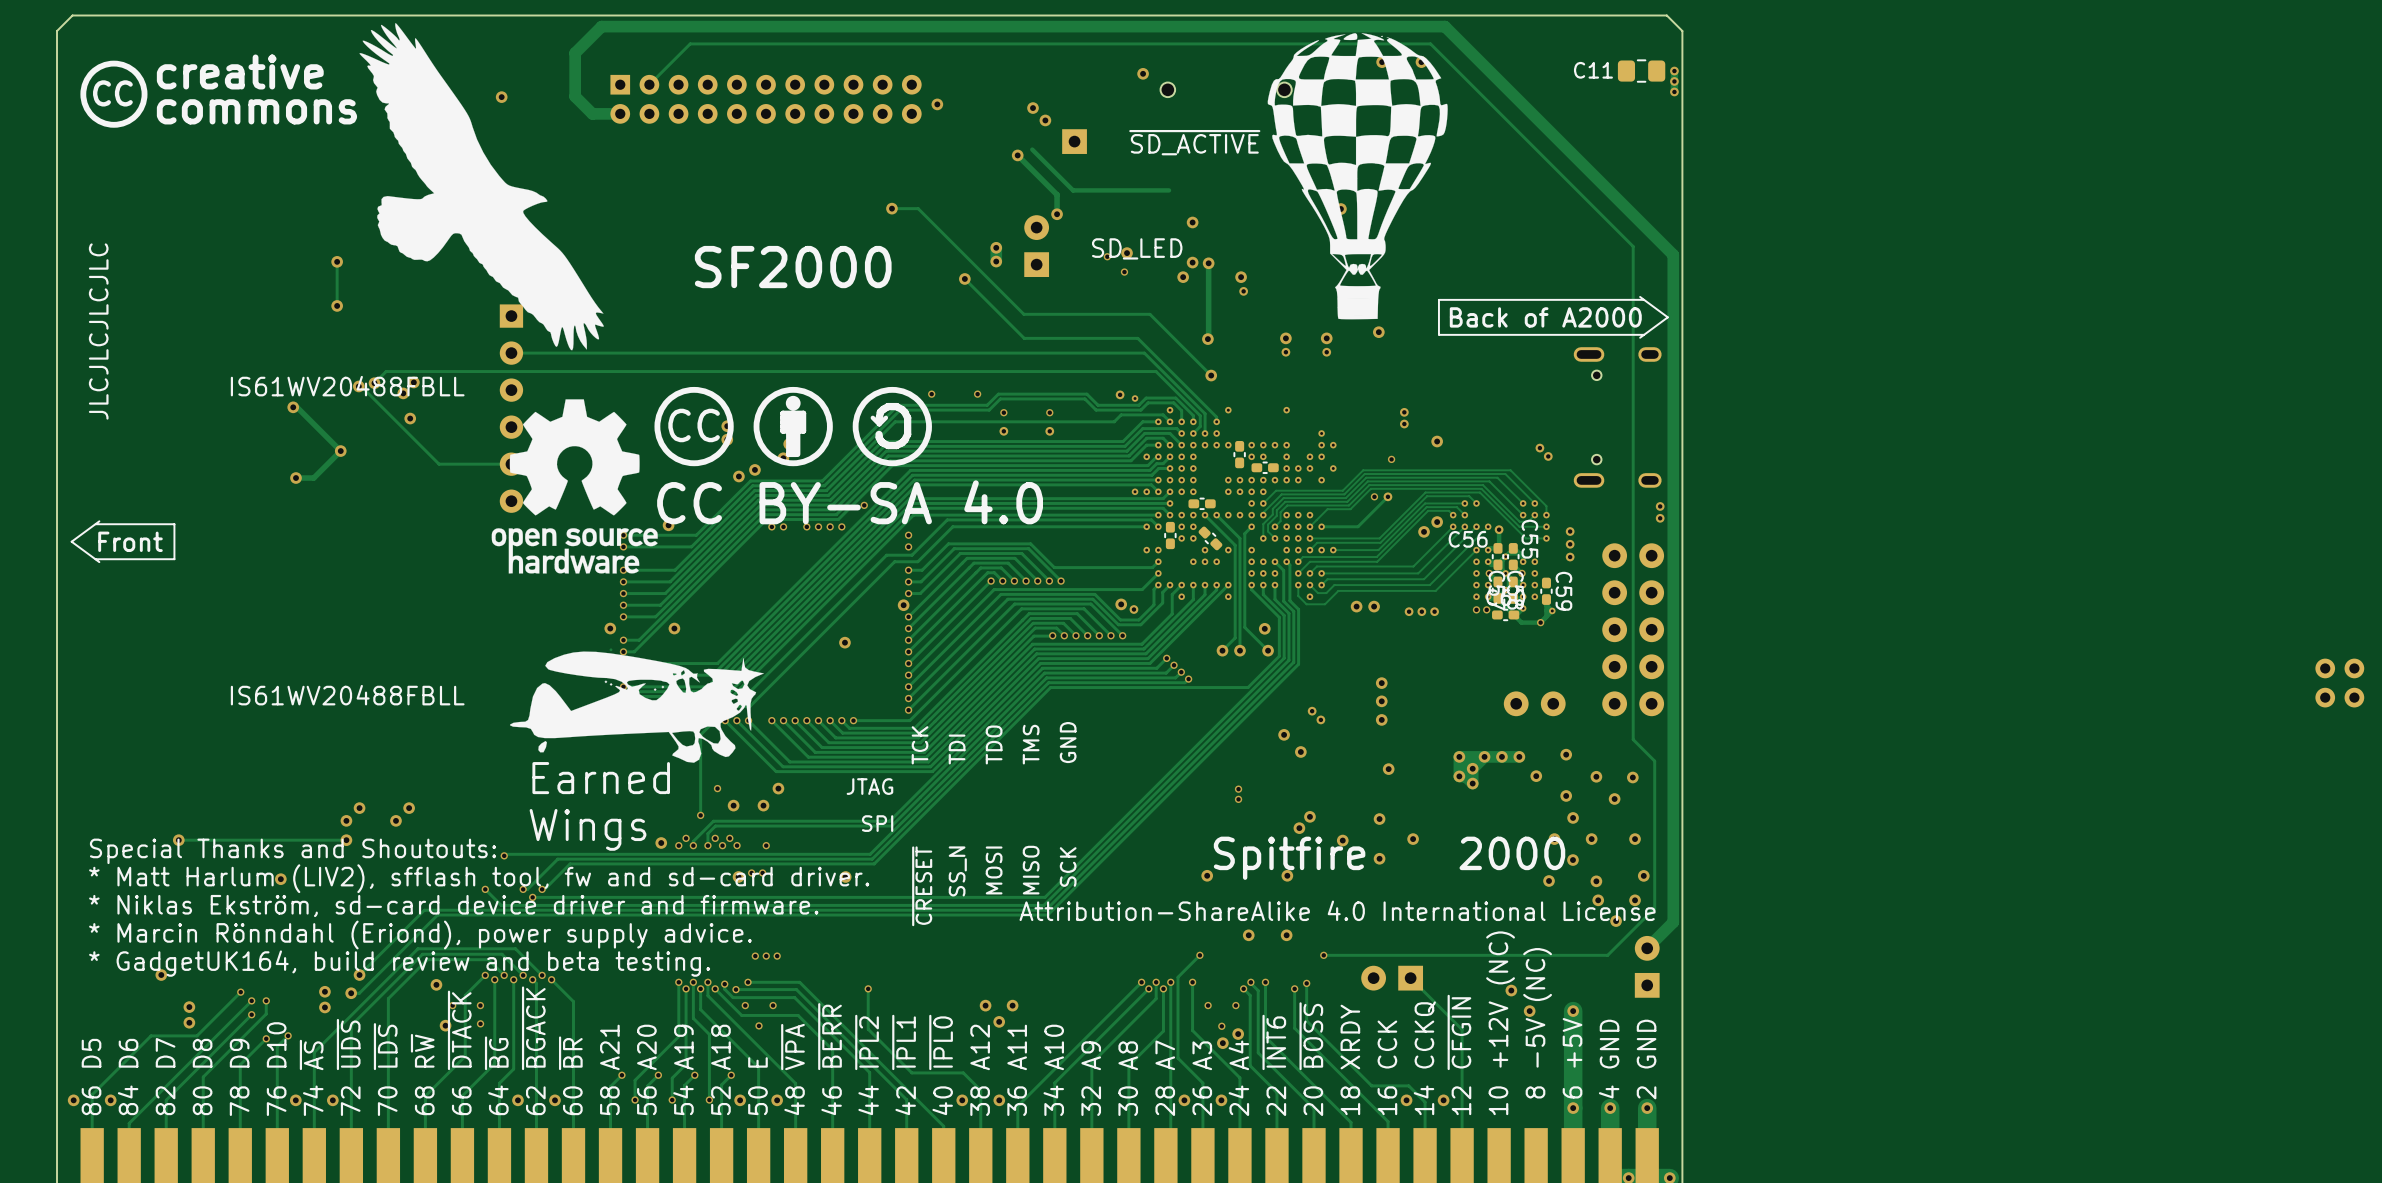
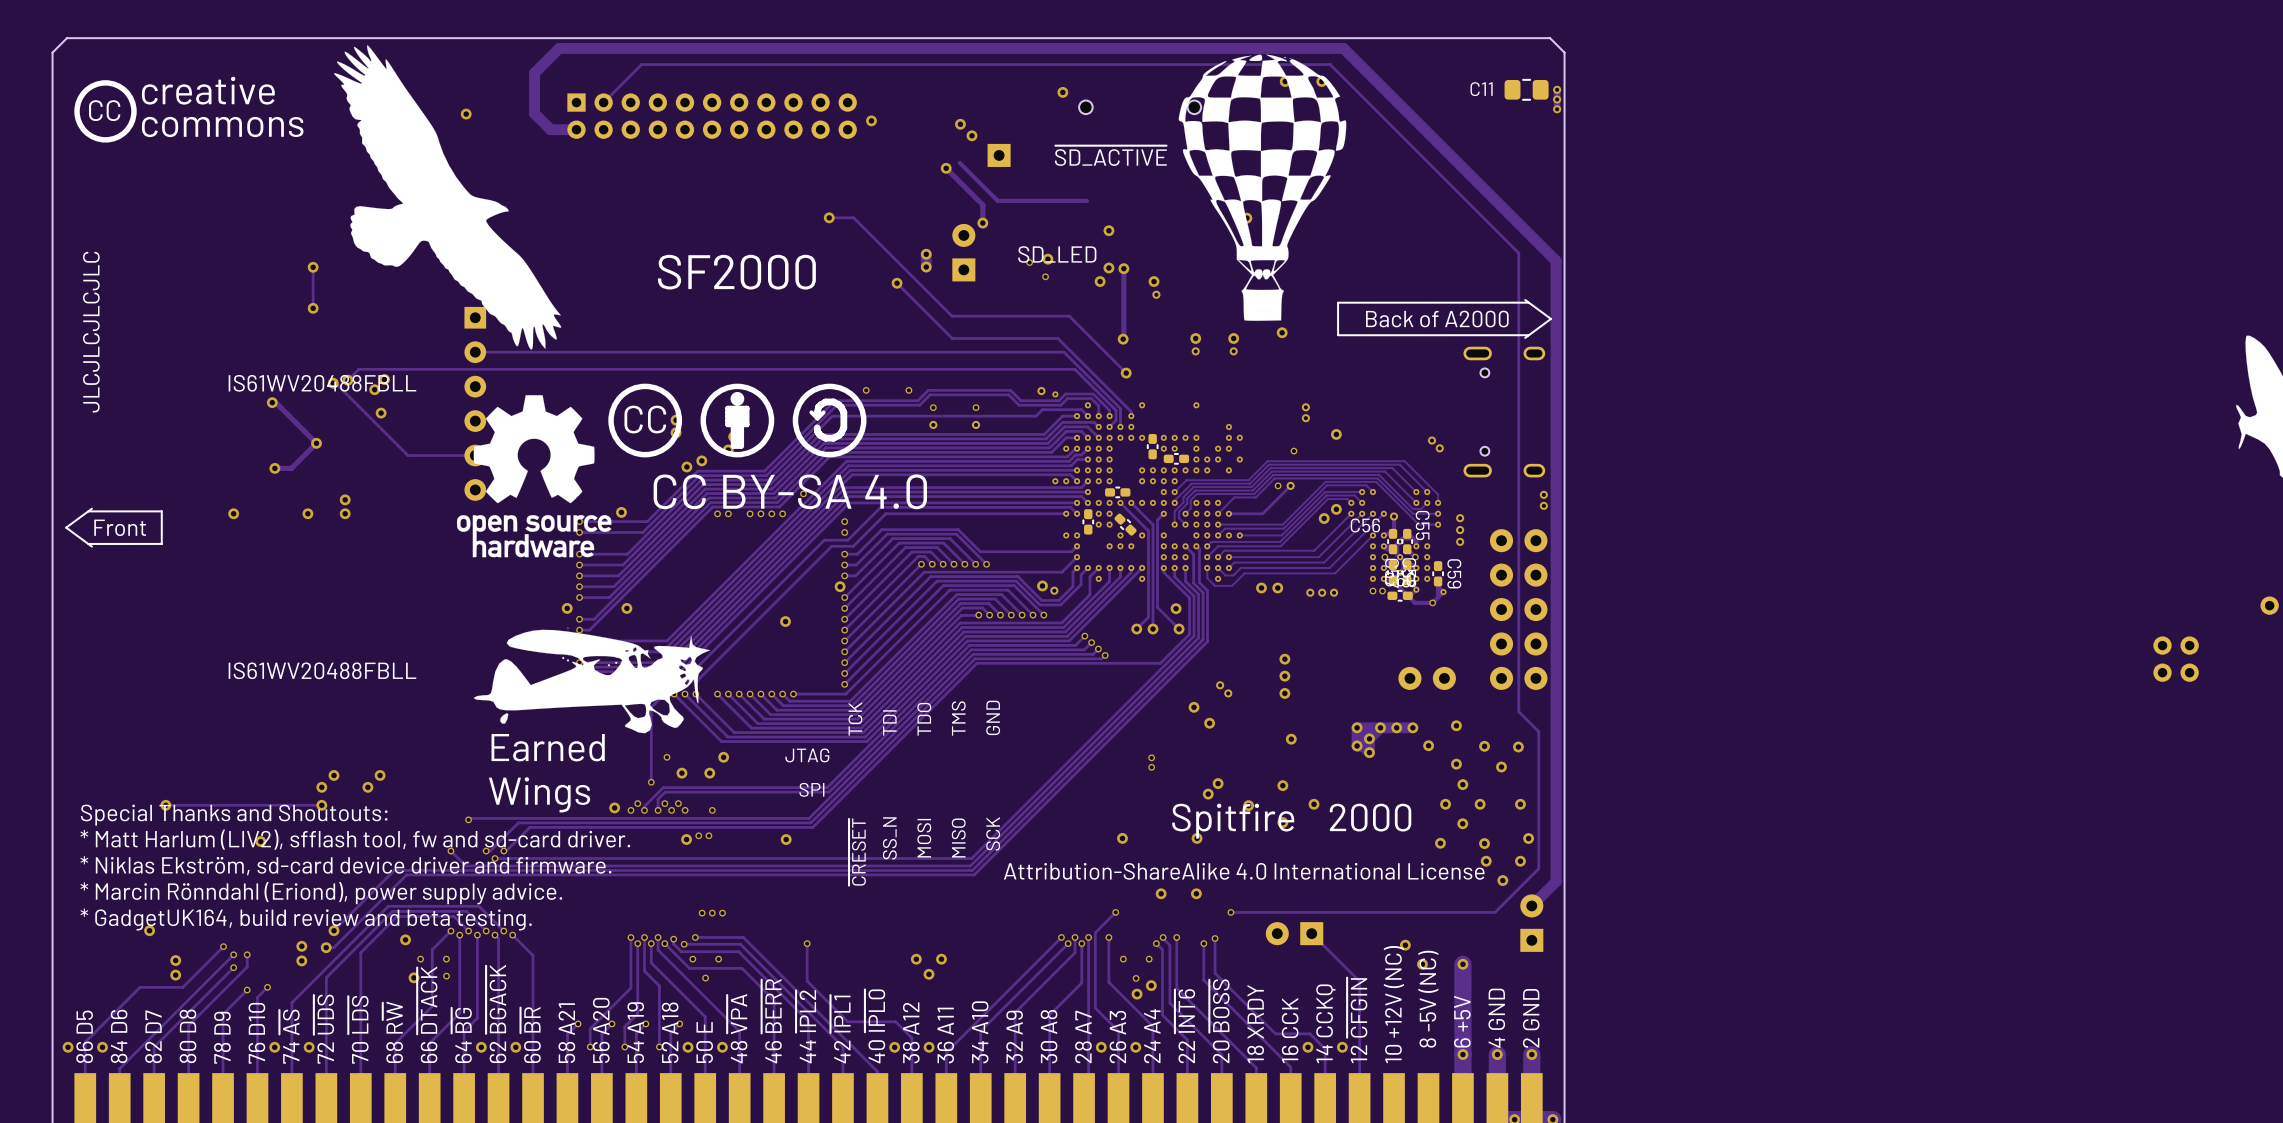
via: none -> (345, 499)
via: none -> (233, 513)
via: none -> (307, 513)
via: none -> (345, 513)

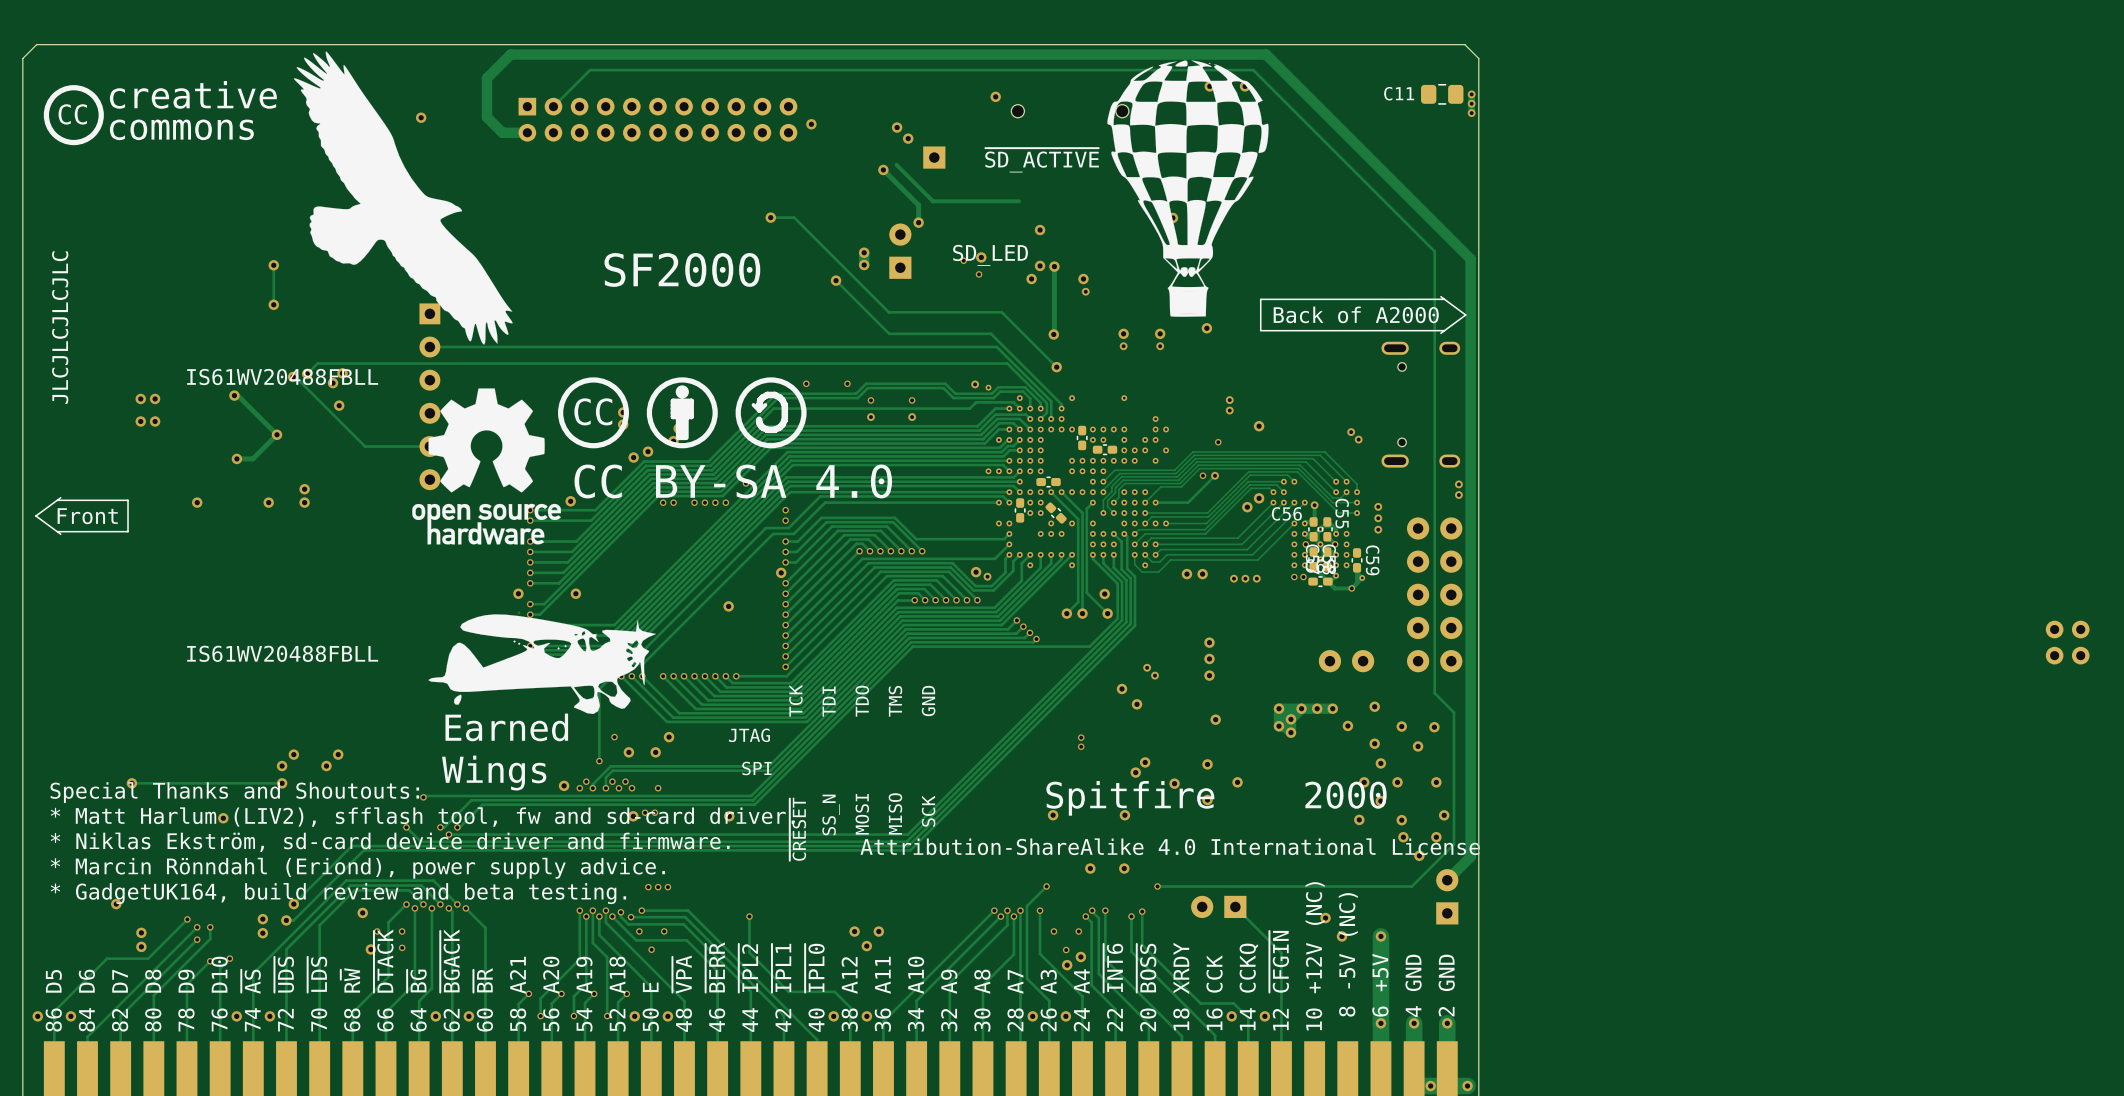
via: none -> (140, 398)
via: none -> (155, 398)
via: none -> (140, 421)
via: none -> (155, 421)

